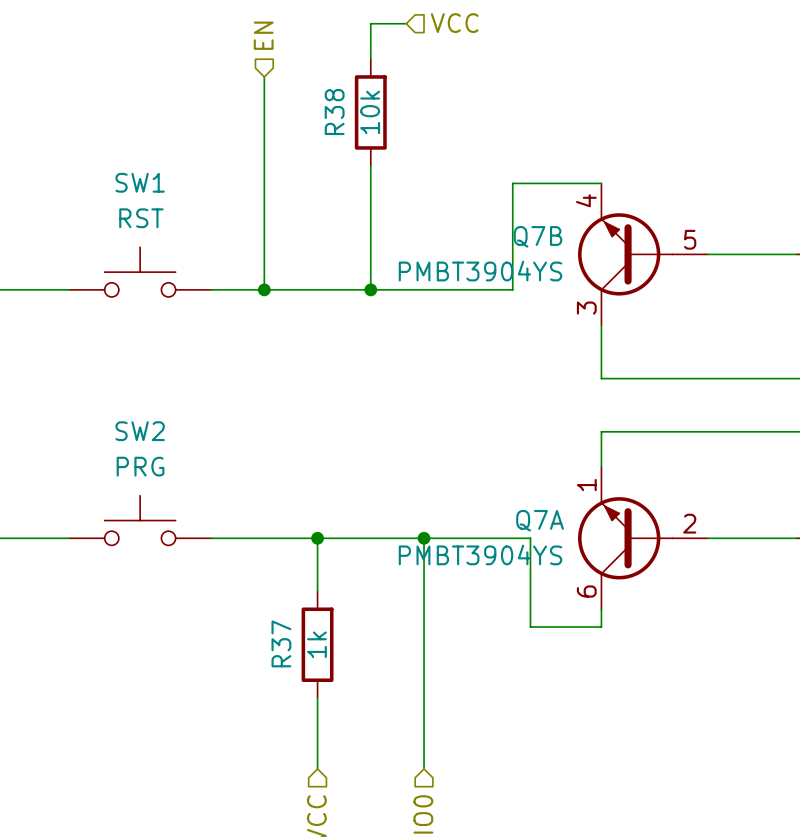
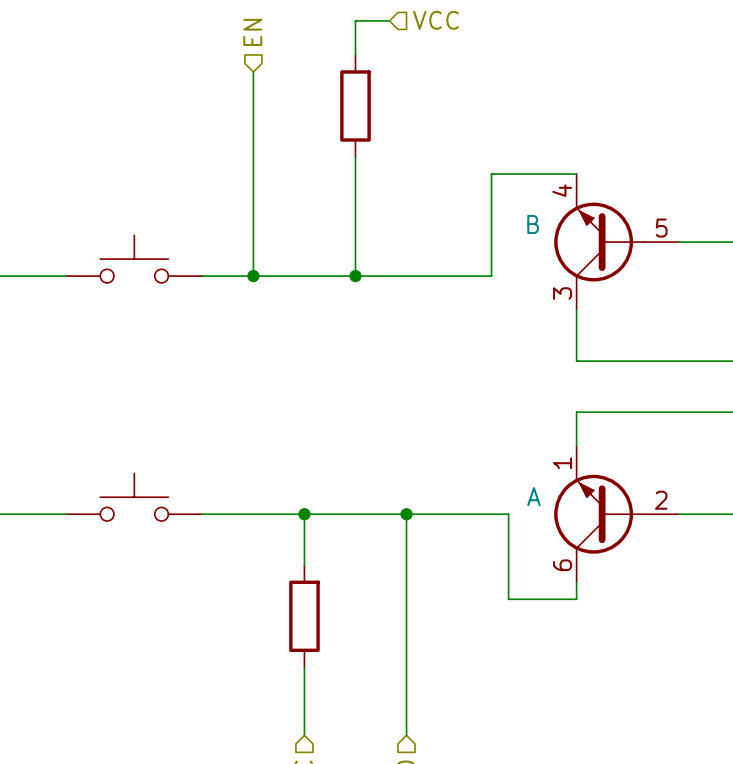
R38 name: R38 (334, 112) -> none
R38 value: 10k (370, 112) -> none
SW1 name: SW1 (140, 182) -> none
SW1 value: RST (141, 218) -> none
Q7B name: Q7B (537, 236) -> B (533, 224)
Q7B value: PMBT3904YS (480, 271) -> none
SW2 name: SW2 (140, 431) -> none
SW2 value: PRG (140, 466) -> none
Q7A name: Q7A (540, 520) -> A (533, 496)
Q7A value: PMBT3904YS (480, 554) -> none
R37 name: R37 (281, 643) -> none
R37 value: 1k (316, 644) -> none

